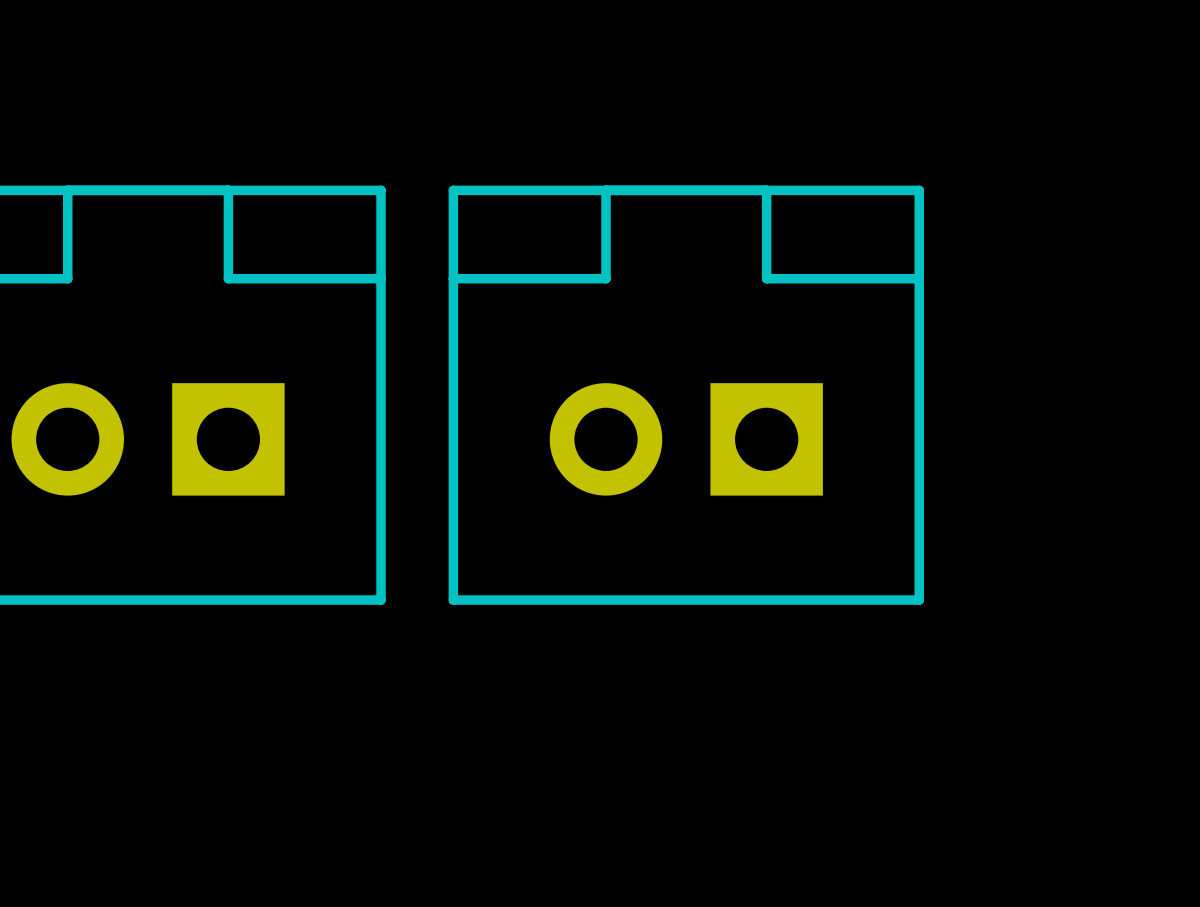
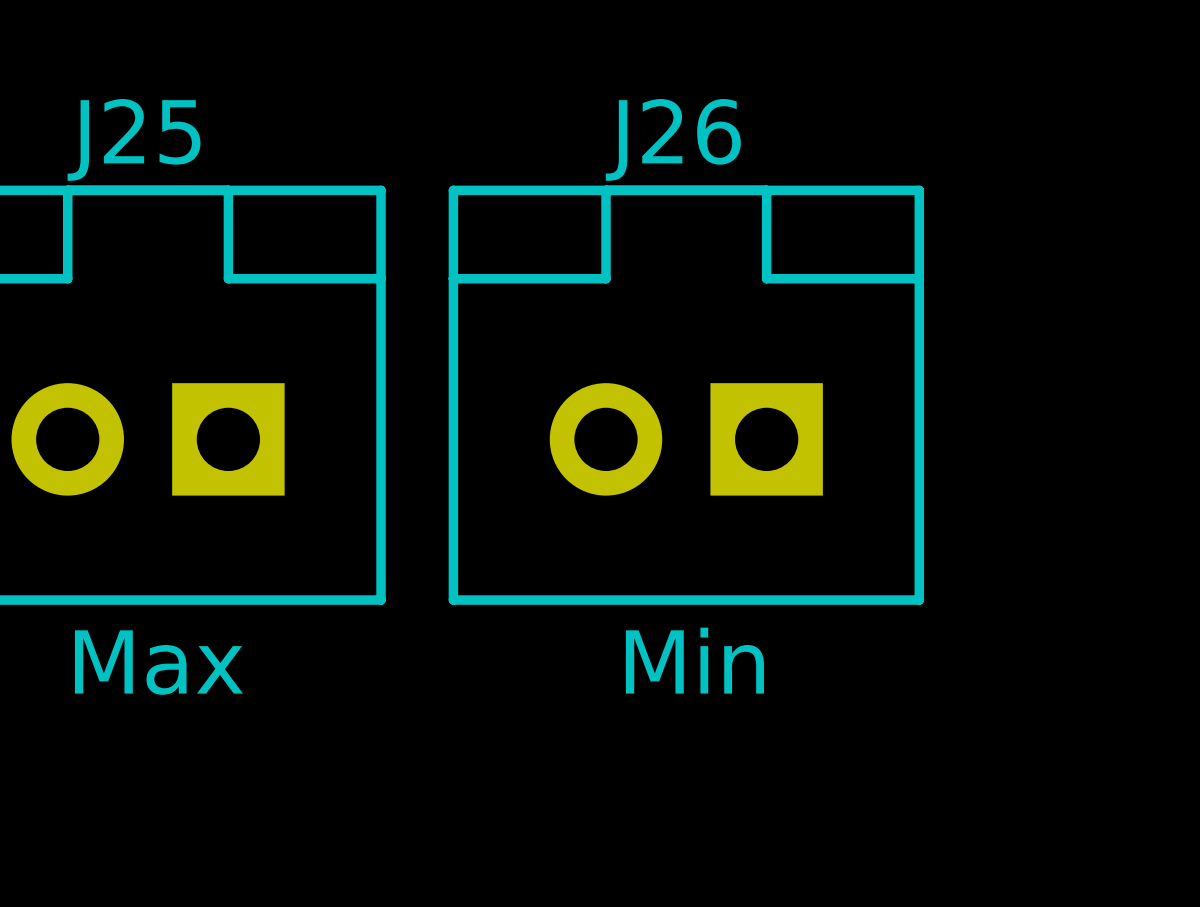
J25 name: none -> J25 (134, 139)
J26 name: none -> J26 (673, 139)
J26 value: none -> Min (694, 660)
J25 value: none -> Max (158, 662)

